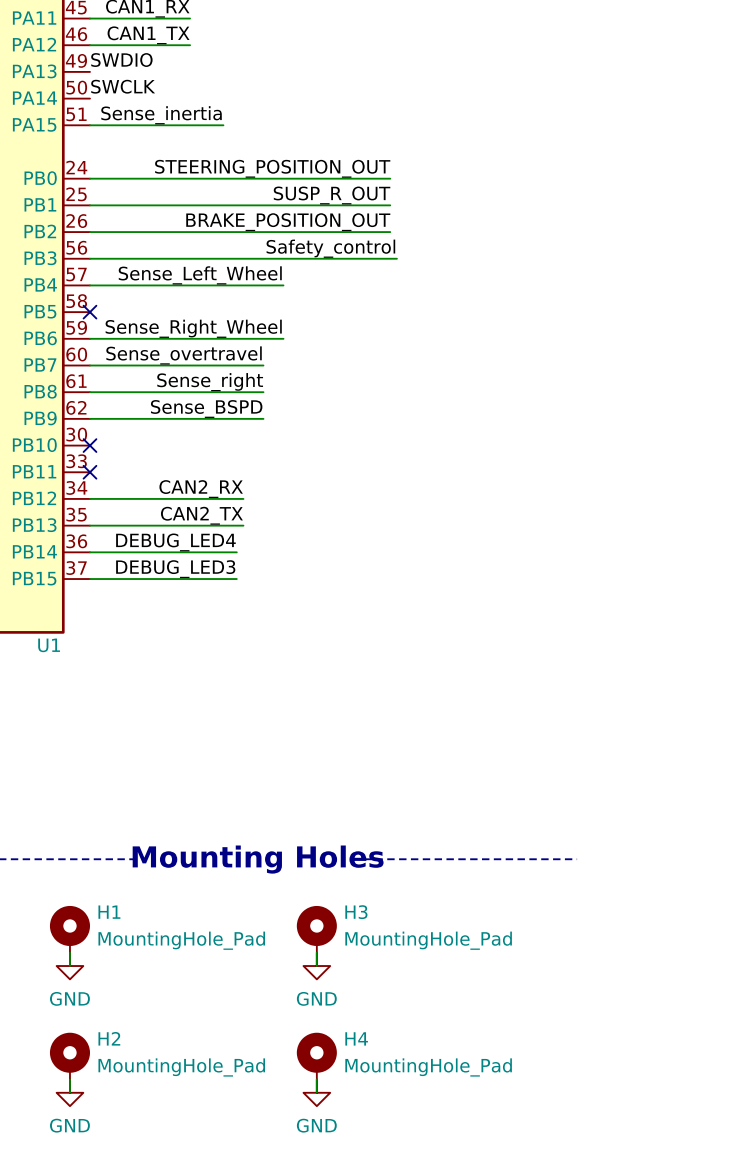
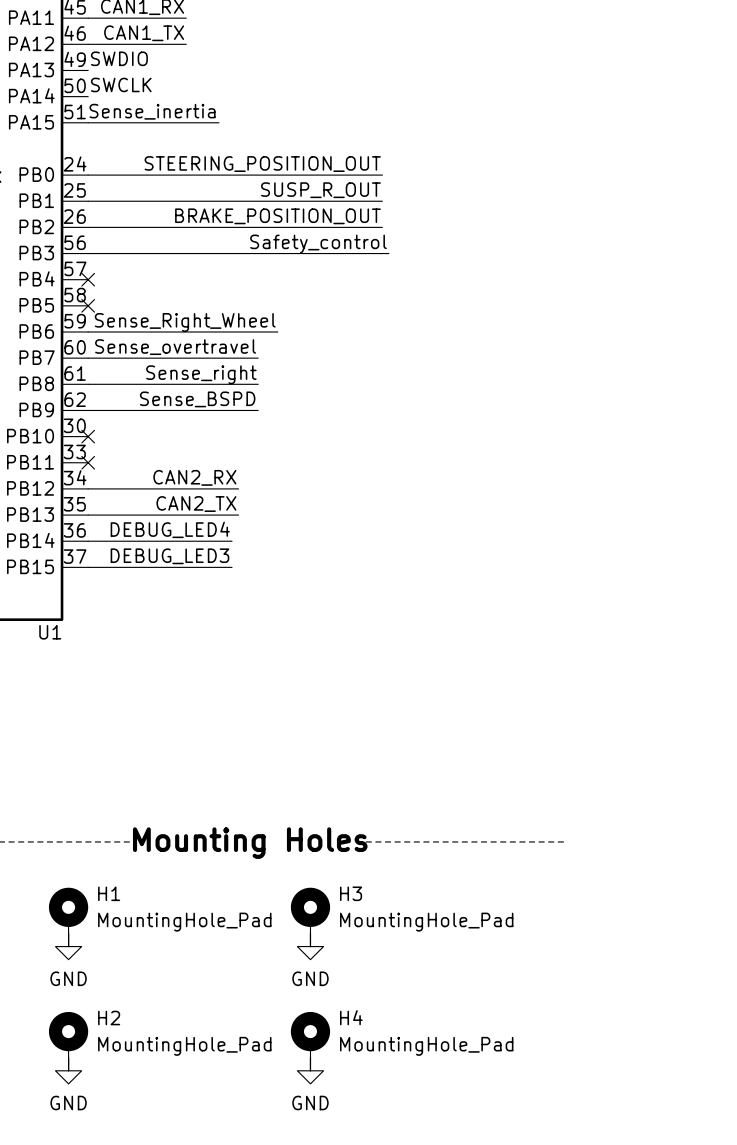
label: Sense_Left_Wheel (200, 275) -> none
wire: (89, 285) (283, 285) -> none
no-connect mark: none -> (88, 279)

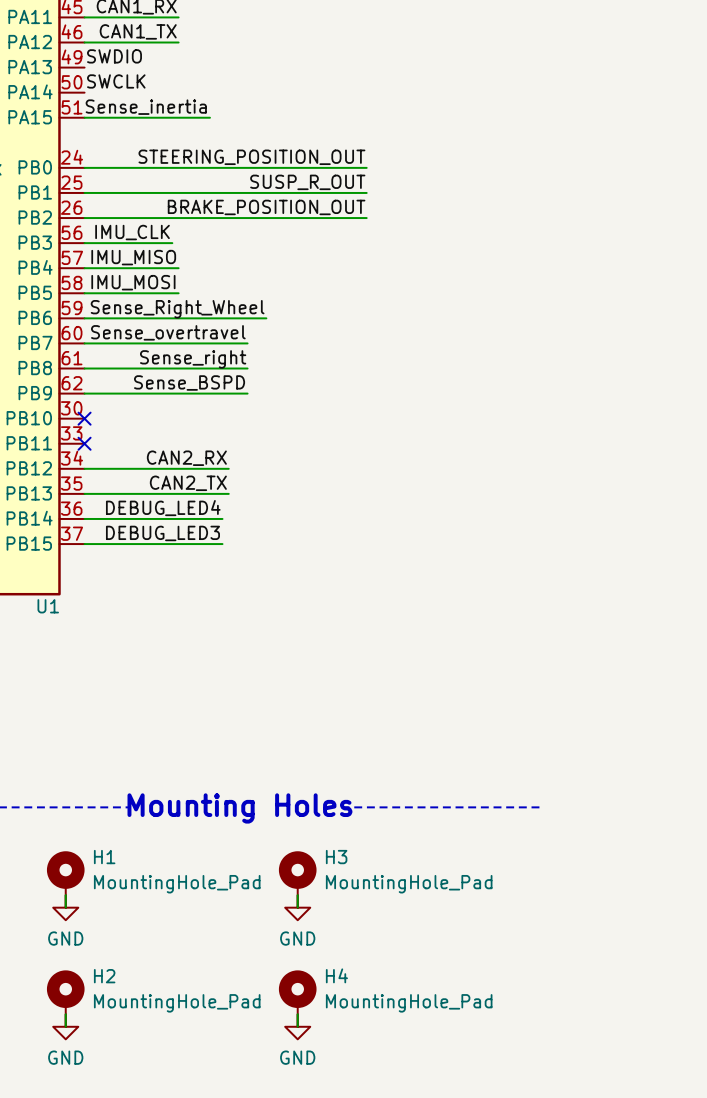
label: none -> IMU_CLK (132, 232)
label: Safety_control (318, 244) -> none
wire: (179, 253) (388, 253) -> none
label: none -> IMU_MISO (133, 257)
wire: none -> (84, 268) (178, 268)
no-connect mark: (88, 279) -> none
label: none -> IMU_MOSI (133, 282)
wire: none -> (84, 293) (178, 293)
no-connect mark: (88, 305) -> none

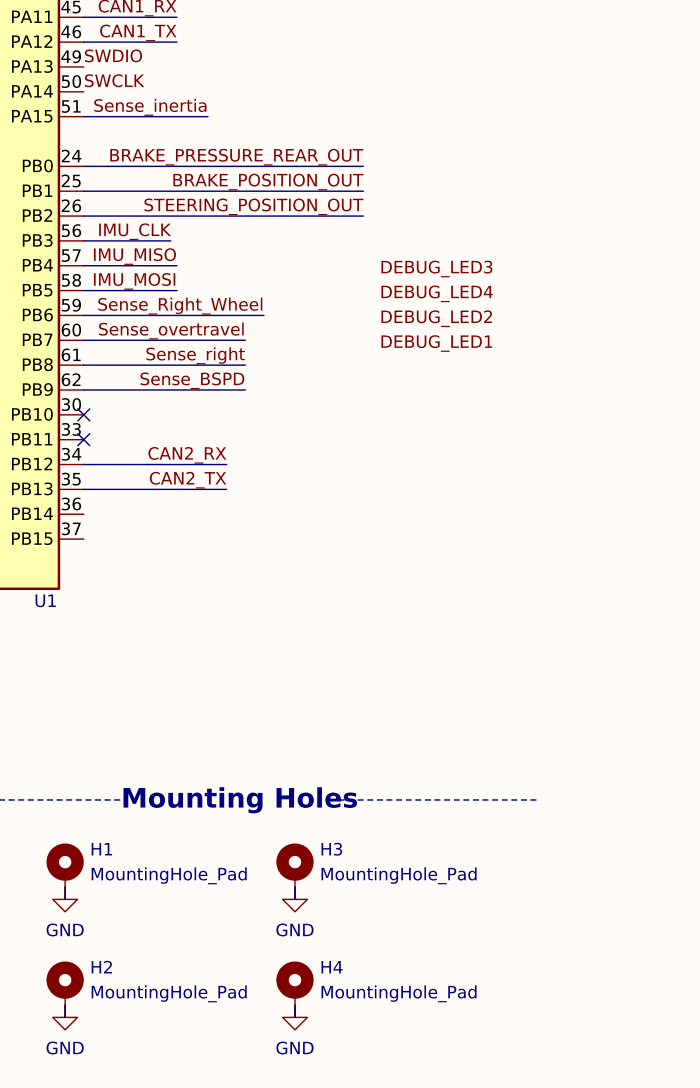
label: STEERING_POSITION_OUT (251, 157) -> BRAKE_PRESSURE_REAR_OUT (236, 157)
label: SUSP_R_OUT (307, 182) -> BRAKE_POSITION_OUT (268, 182)
label: BRAKE_POSITION_OUT (266, 207) -> STEERING_POSITION_OUT (253, 206)
label: none -> DEBUG_LED3 (436, 268)
label: none -> DEBUG_LED4 (437, 293)
label: none -> DEBUG_LED2 (436, 318)
label: none -> DEBUG_LED1 (436, 343)
label: DEBUG_LED4 (163, 508) -> none
wire: (84, 518) (222, 518) -> none
label: DEBUG_LED3 (162, 533) -> none
wire: (84, 544) (222, 544) -> none

